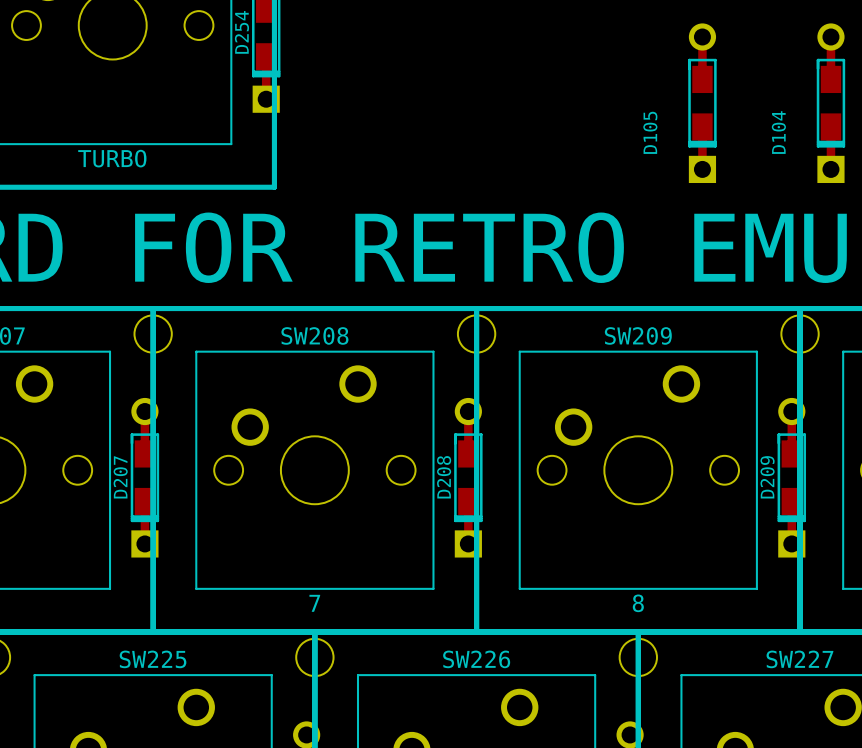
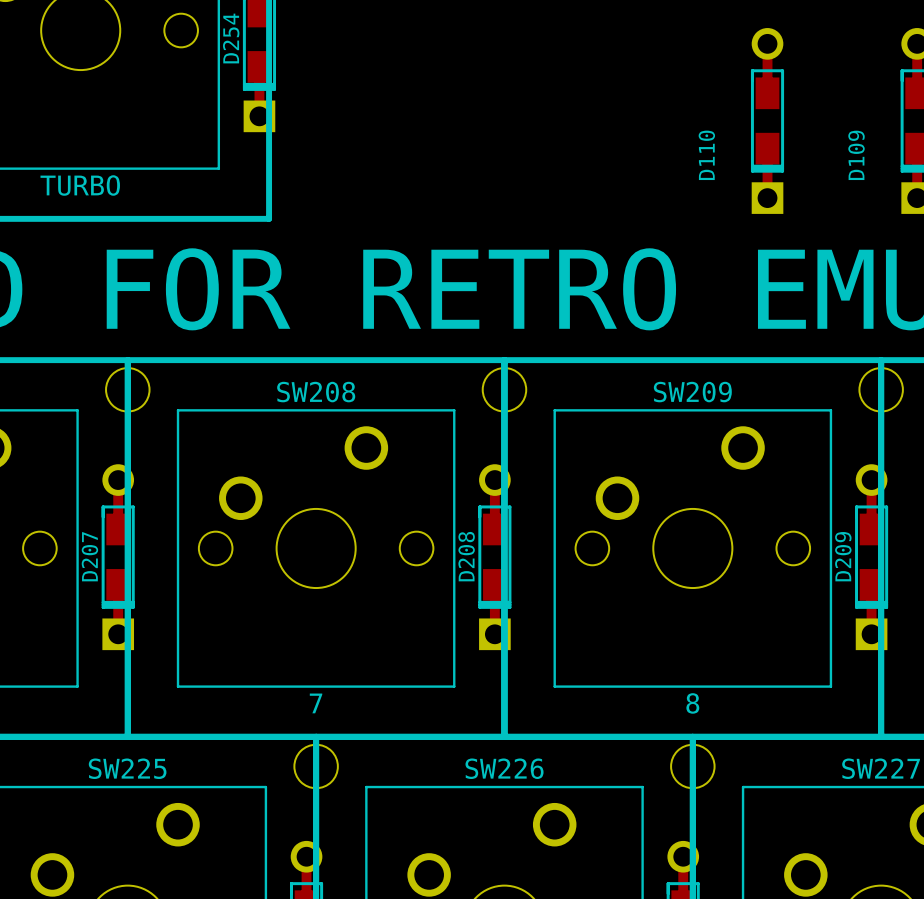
D105 name: D105 (650, 132) -> D110 (706, 155)
D104 name: D104 (778, 132) -> D109 (856, 155)

